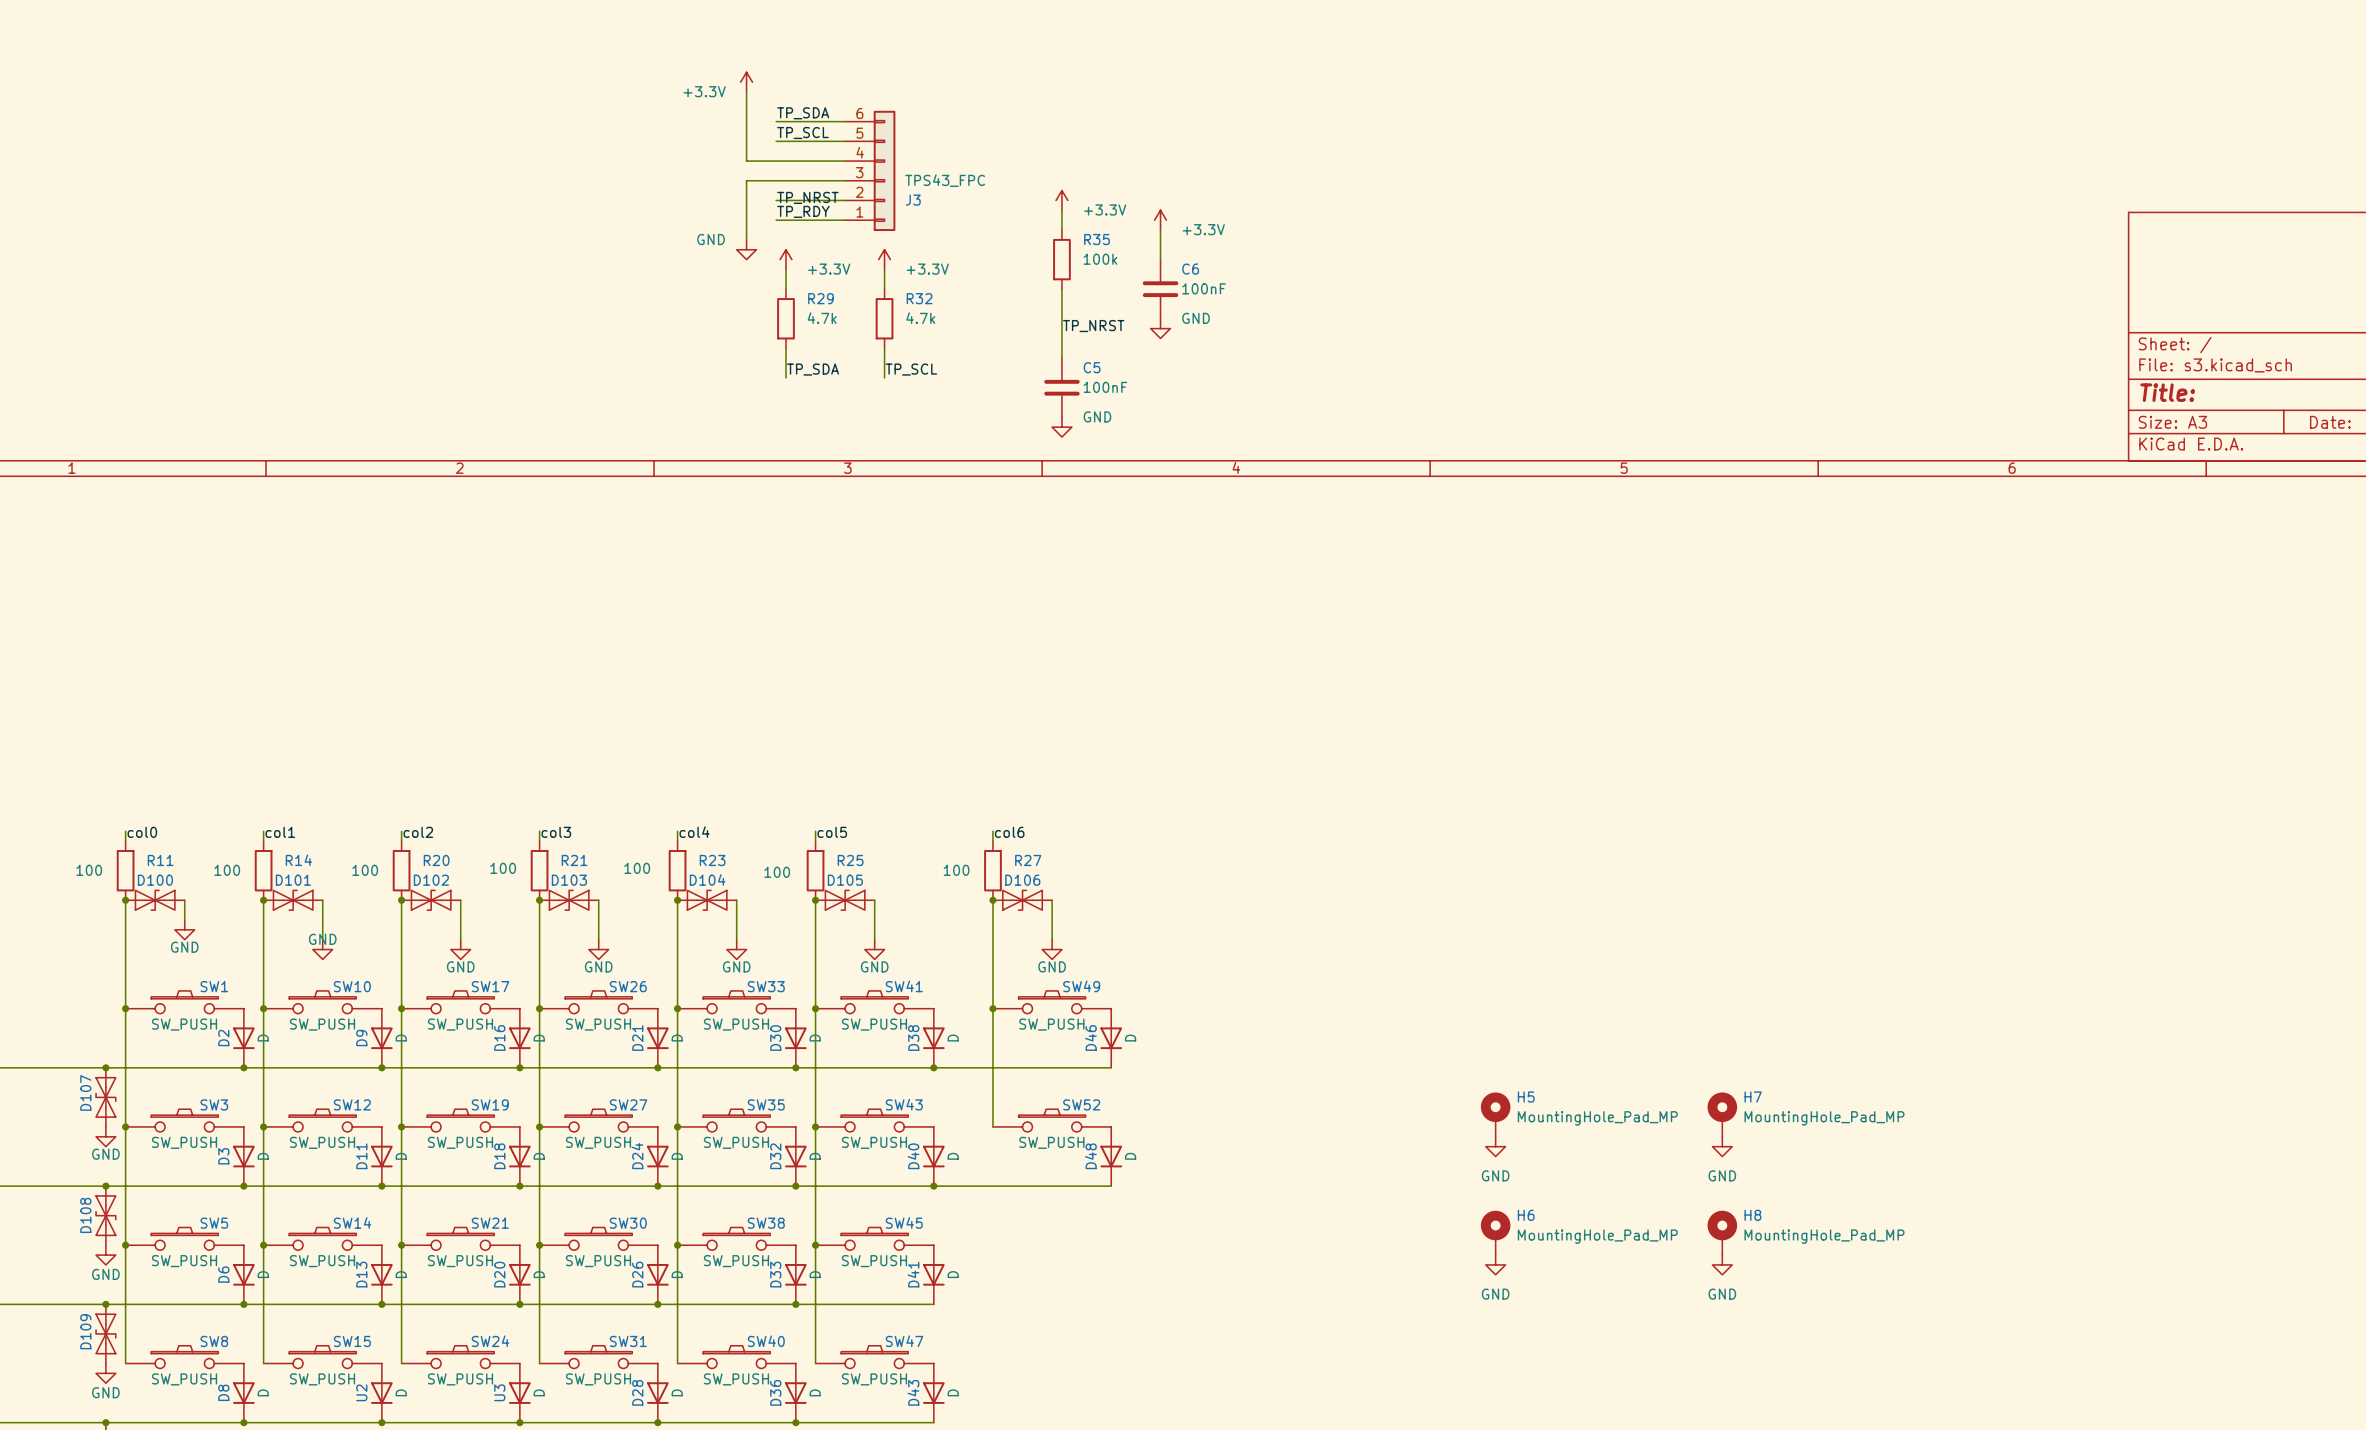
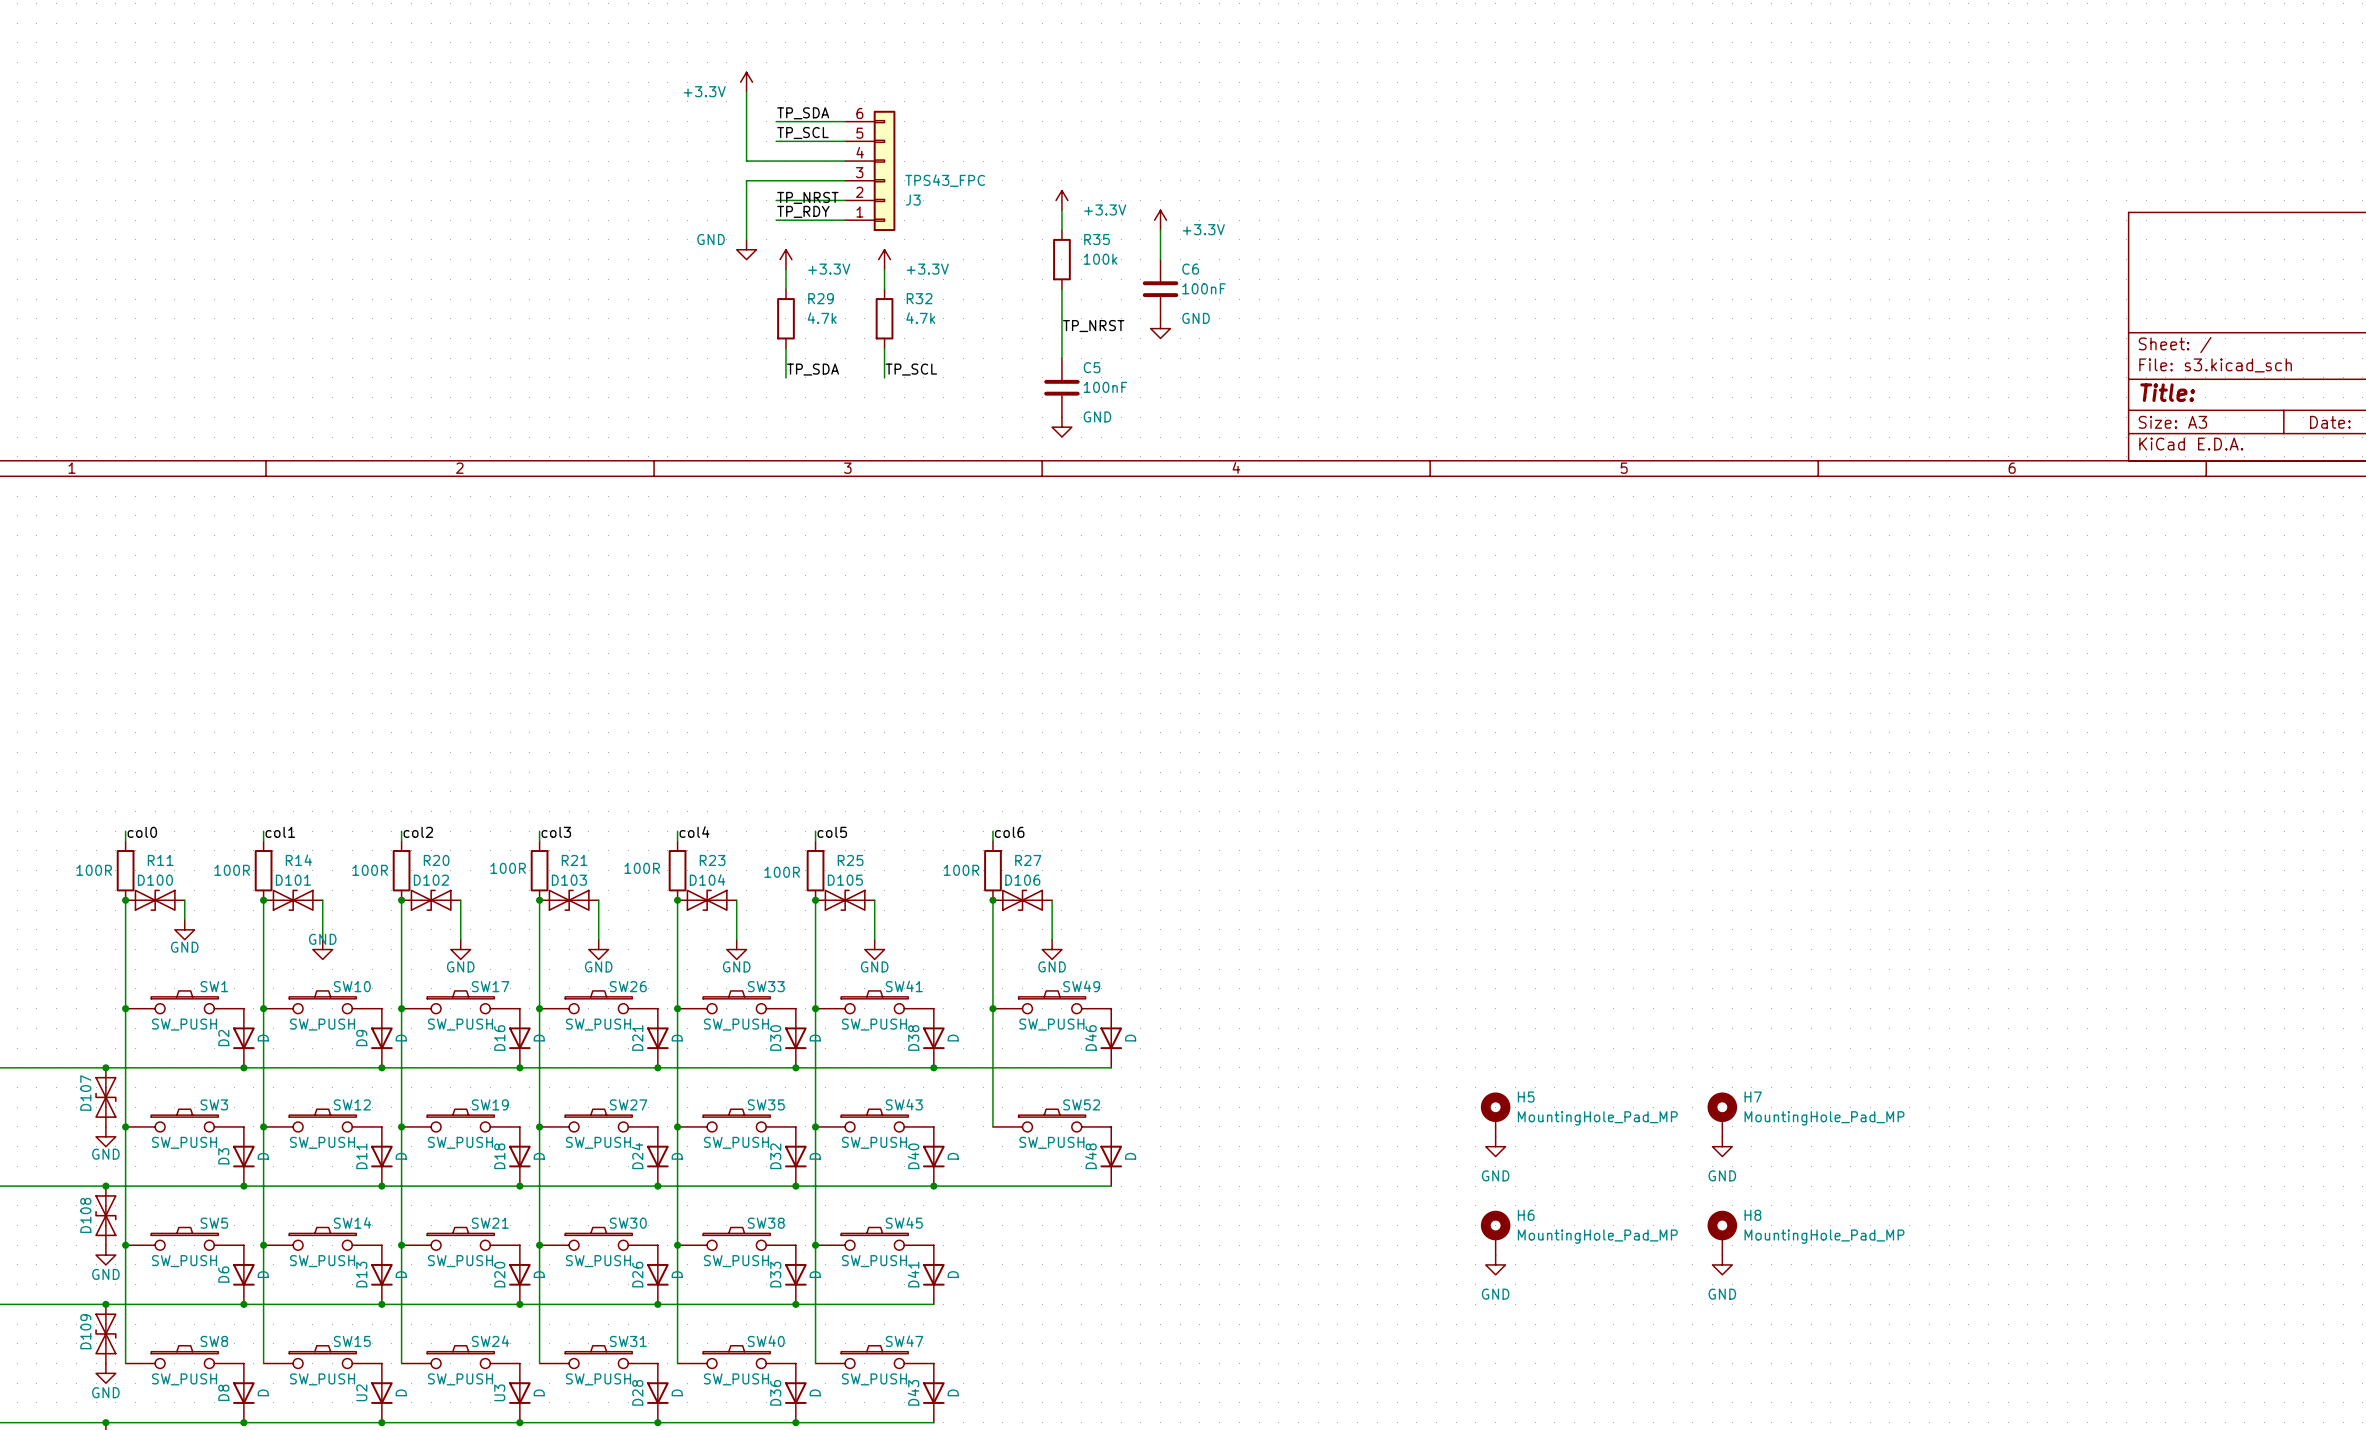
R21 value: 100 (503, 868) -> 100R (508, 868)
R23 value: 100 (637, 868) -> 100R (642, 868)
R11 value: 100 (89, 870) -> 100R (94, 870)
R14 value: 100 (227, 870) -> 100R (232, 870)
R20 value: 100 (365, 870) -> 100R (370, 870)
R27 value: 100 (956, 870) -> 100R (961, 870)
R25 value: 100 (777, 872) -> 100R (782, 872)

